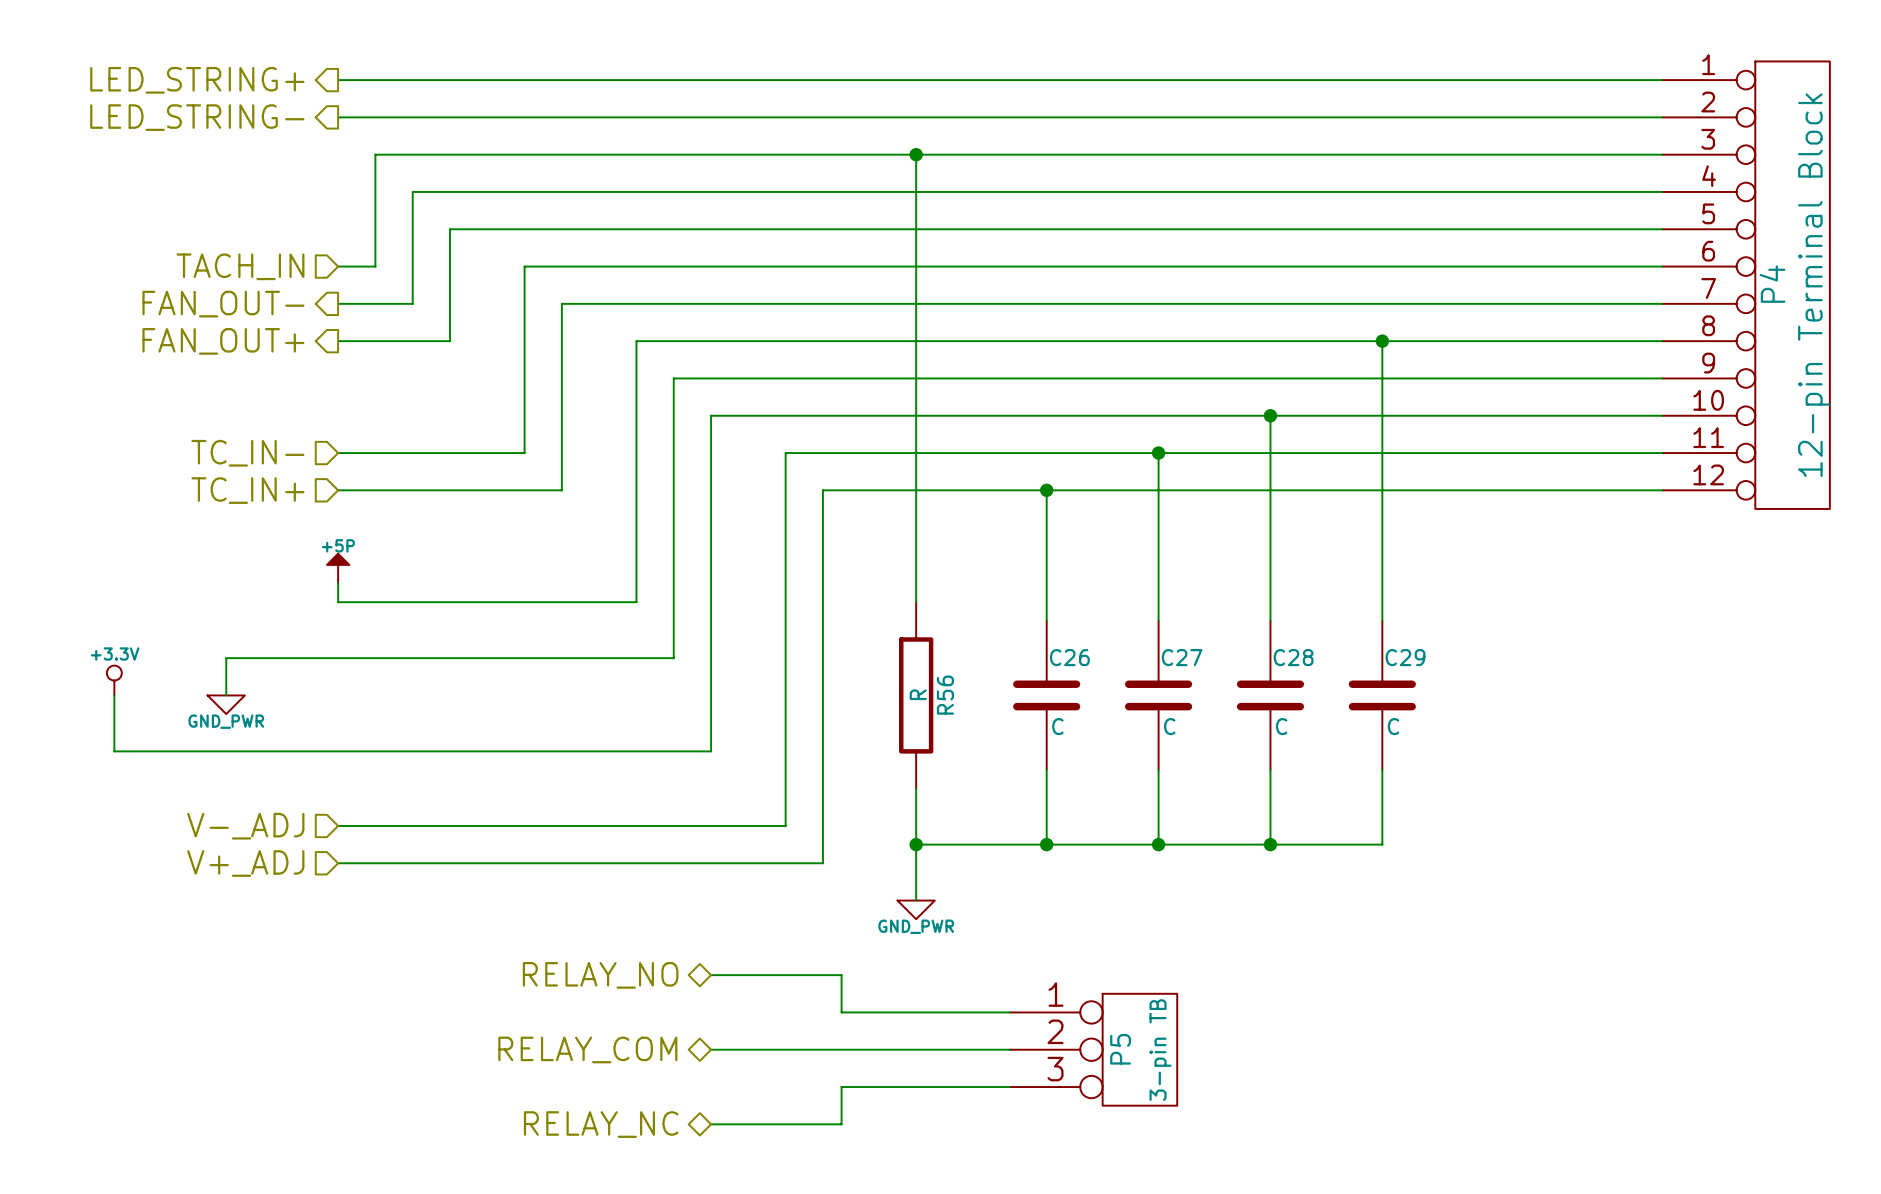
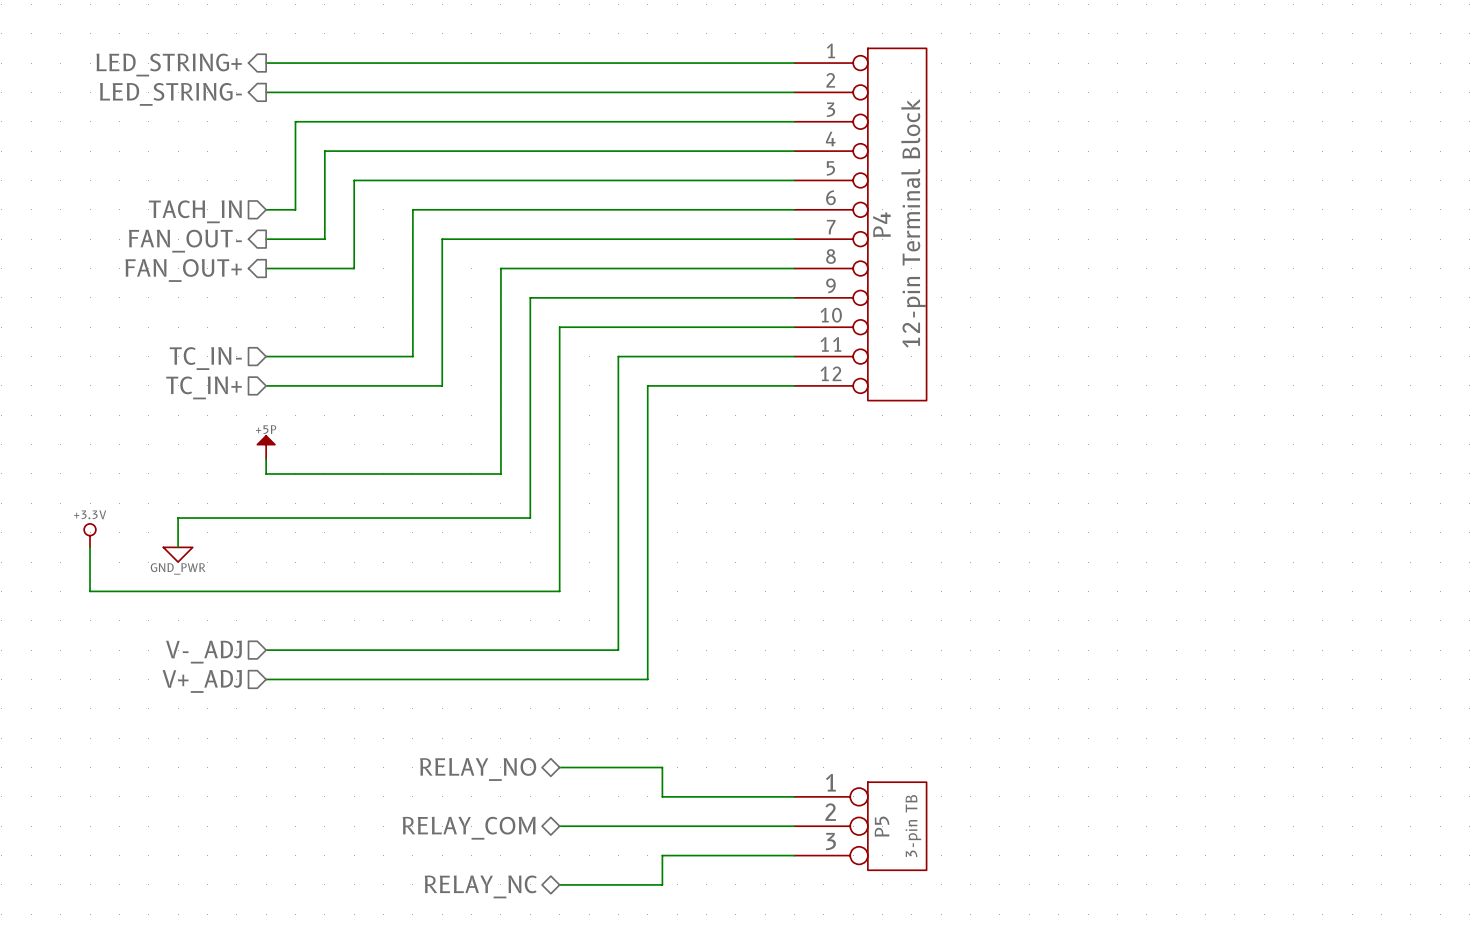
wire: (1009, 80) (1662, 80) -> none
wire: (1009, 117) (1662, 117) -> none
wire: (916, 154) (916, 602) -> none
junction: (916, 154) -> none
wire: (1009, 154) (1662, 154) -> none
wire: (1009, 191) (1662, 191) -> none
wire: (1009, 229) (1662, 229) -> none
wire: (1009, 266) (1662, 266) -> none
P4 position: (1745, 285) -> (860, 224)
wire: (1009, 303) (1662, 303) -> none
wire: (1009, 341) (1662, 341) -> none
wire: (1382, 341) (1382, 620) -> none
junction: (1382, 341) -> none
wire: (1009, 378) (1662, 378) -> none
wire: (1009, 415) (1662, 415) -> none
wire: (1270, 415) (1270, 620) -> none
junction: (1270, 415) -> none
wire: (1009, 453) (1662, 453) -> none
wire: (1158, 453) (1158, 620) -> none
junction: (1158, 453) -> none
wire: (1009, 490) (1662, 490) -> none
wire: (1046, 490) (1046, 620) -> none
junction: (1046, 490) -> none
R56: R (916, 695) -> none
C26: C (1046, 695) -> none
C27: C (1158, 695) -> none
C28: C (1270, 695) -> none
C29: C (1382, 695) -> none
wire: (1046, 770) (1046, 844) -> none
wire: (1158, 770) (1158, 844) -> none
wire: (1270, 770) (1270, 844) -> none
wire: (1382, 770) (1382, 844) (916, 844) -> none
wire: (916, 788) (916, 900) -> none
junction: (916, 844) -> none
junction: (1046, 844) -> none
junction: (1158, 844) -> none
junction: (1270, 844) -> none
power symbol: GND_PWR (916, 909) -> none

